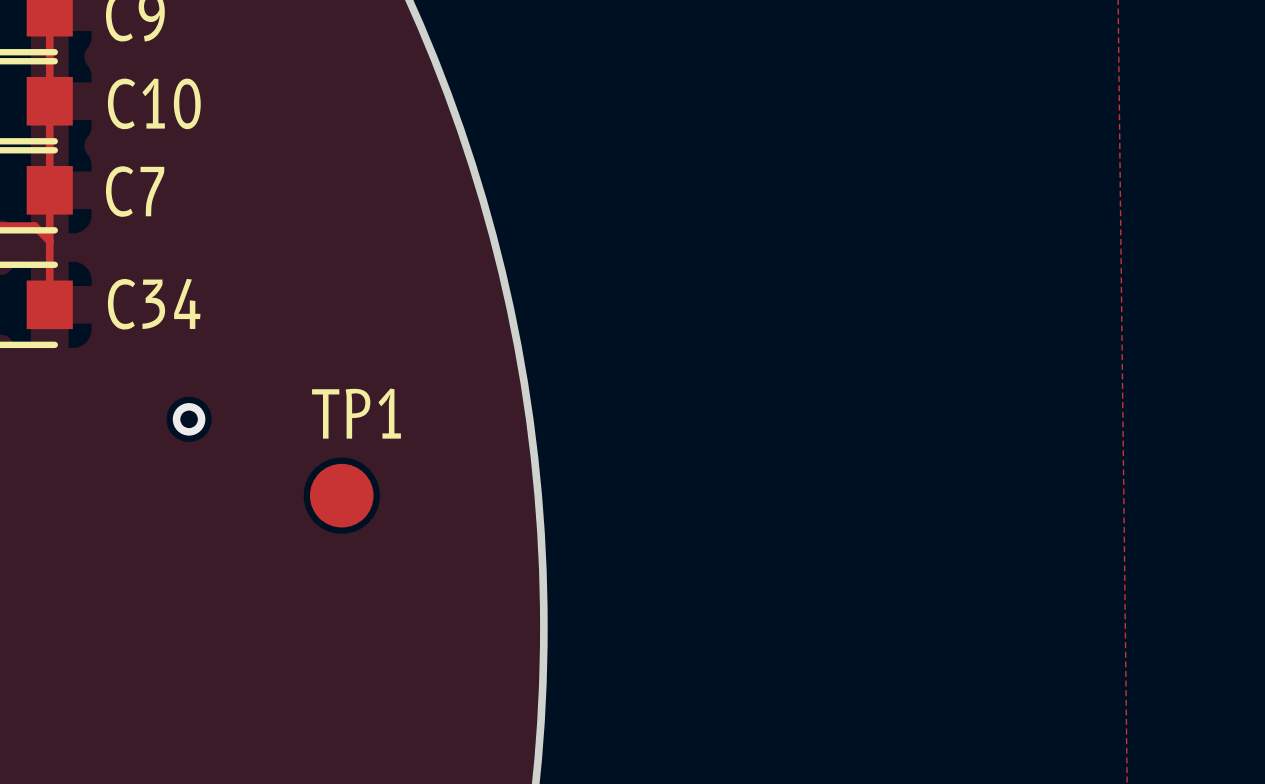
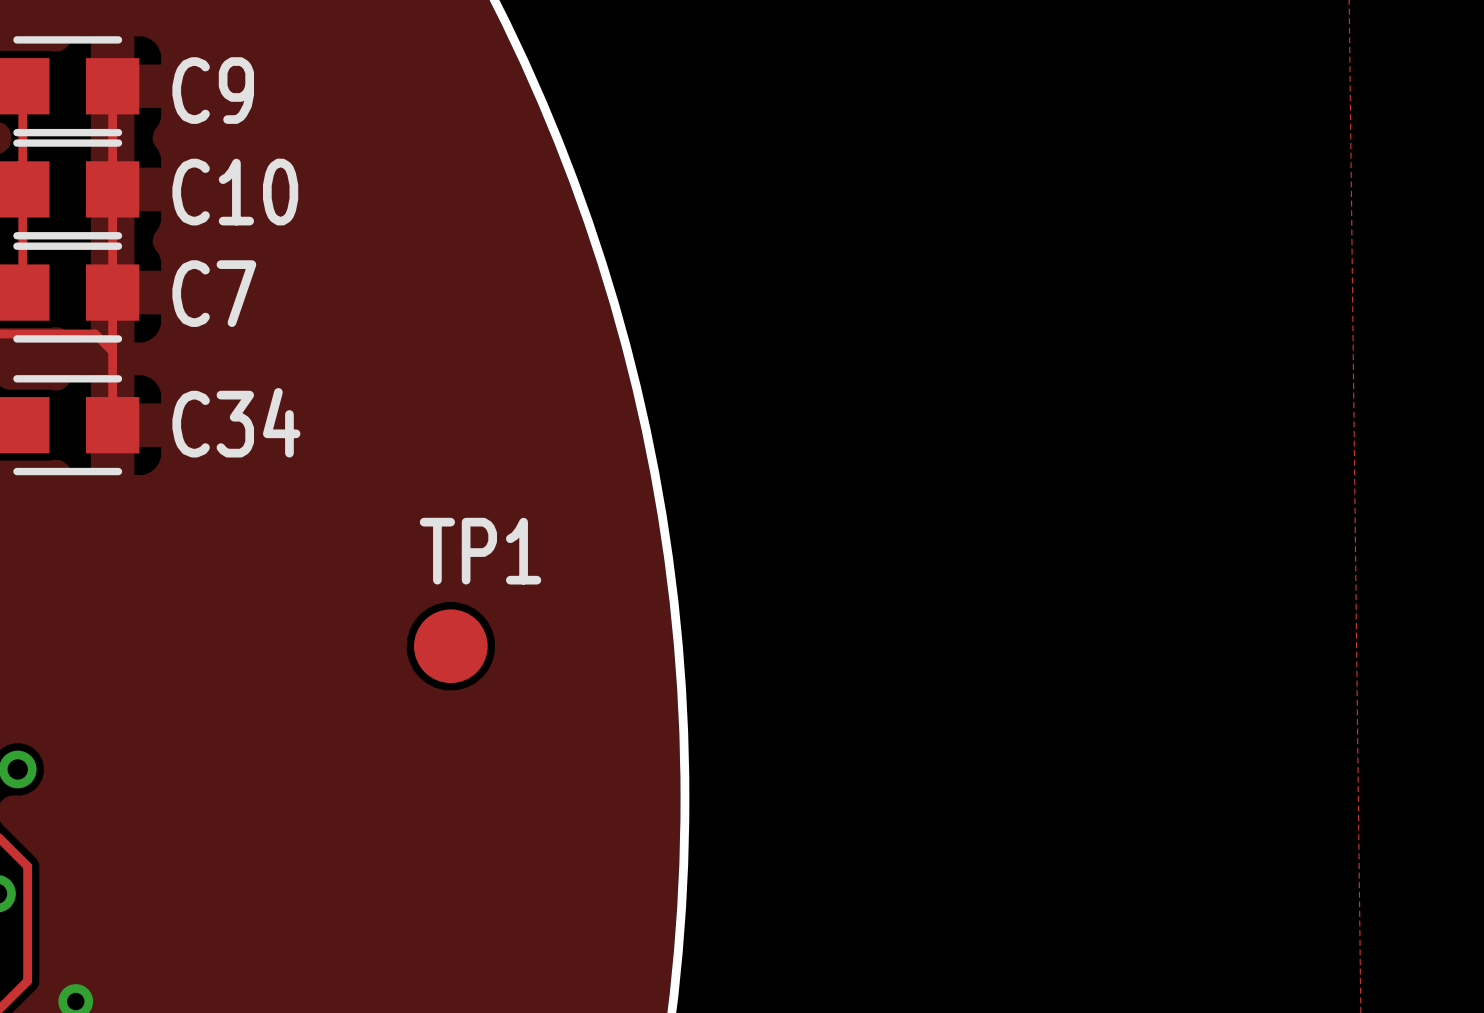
via: (189, 419) -> none

